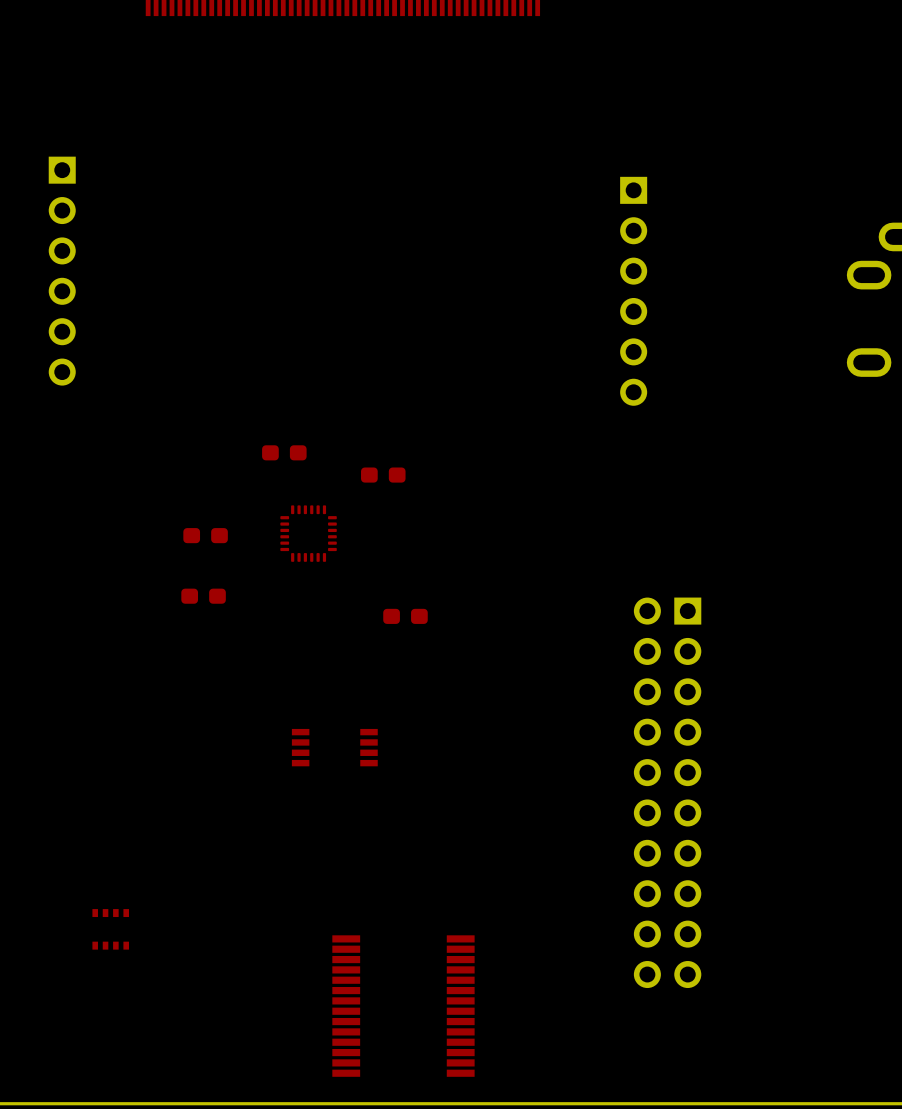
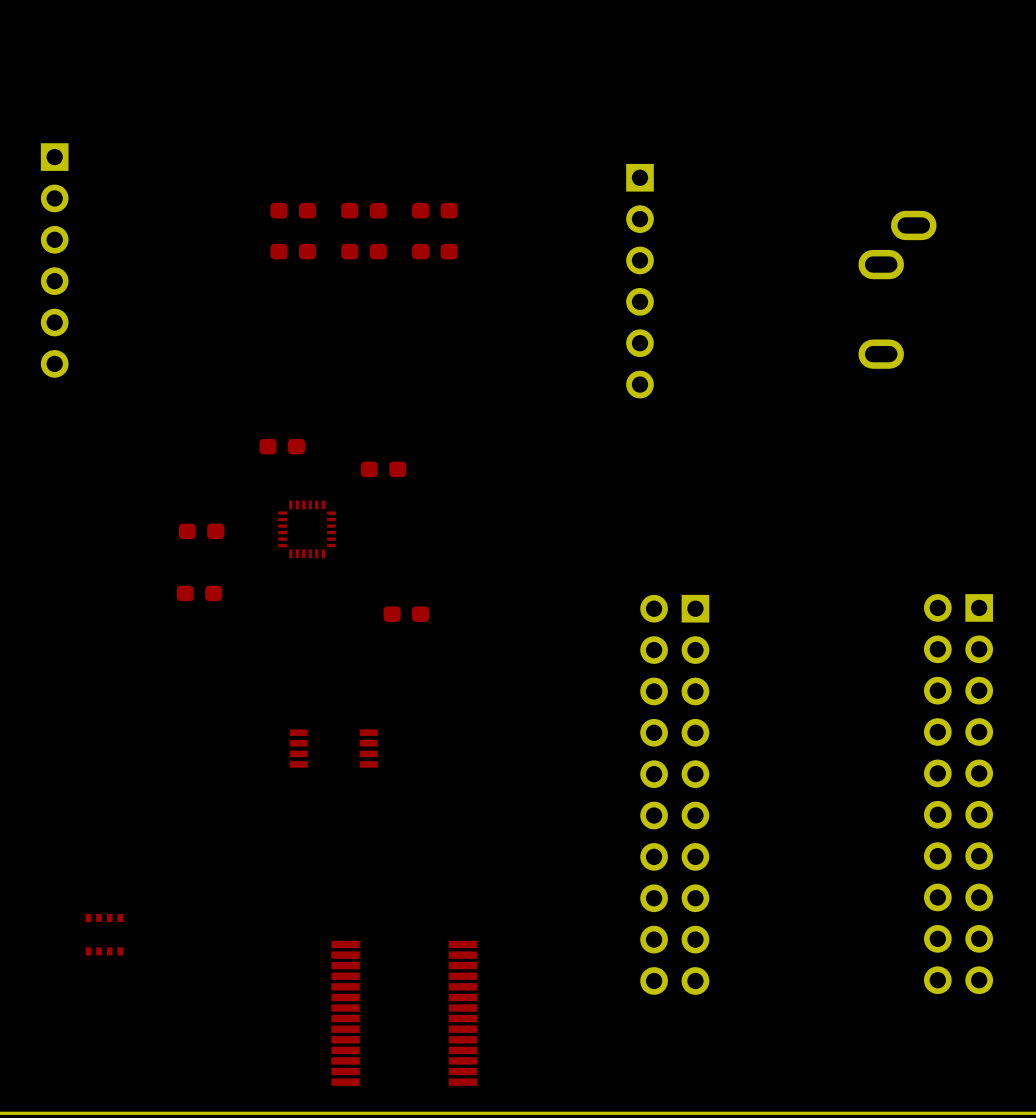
part: none -> (293, 210)
part: none -> (364, 210)
part: none -> (434, 210)
part: none -> (293, 251)
part: none -> (364, 251)
part: none -> (434, 251)

